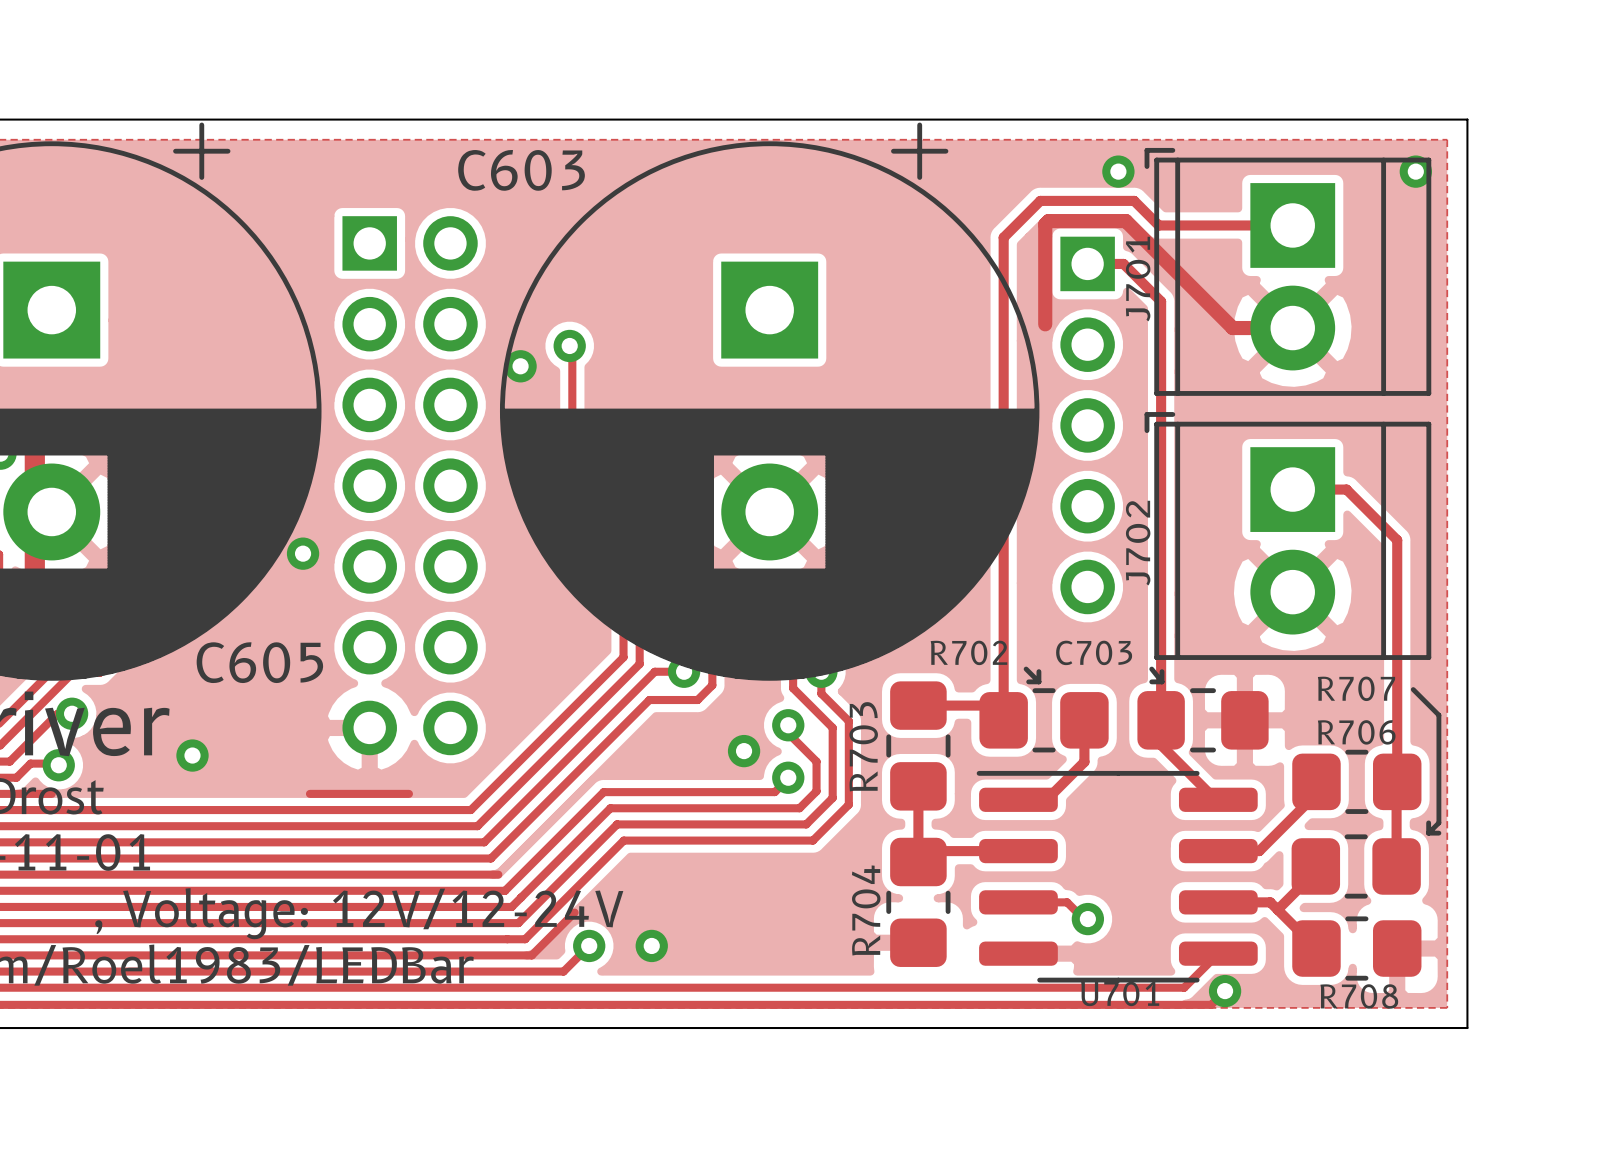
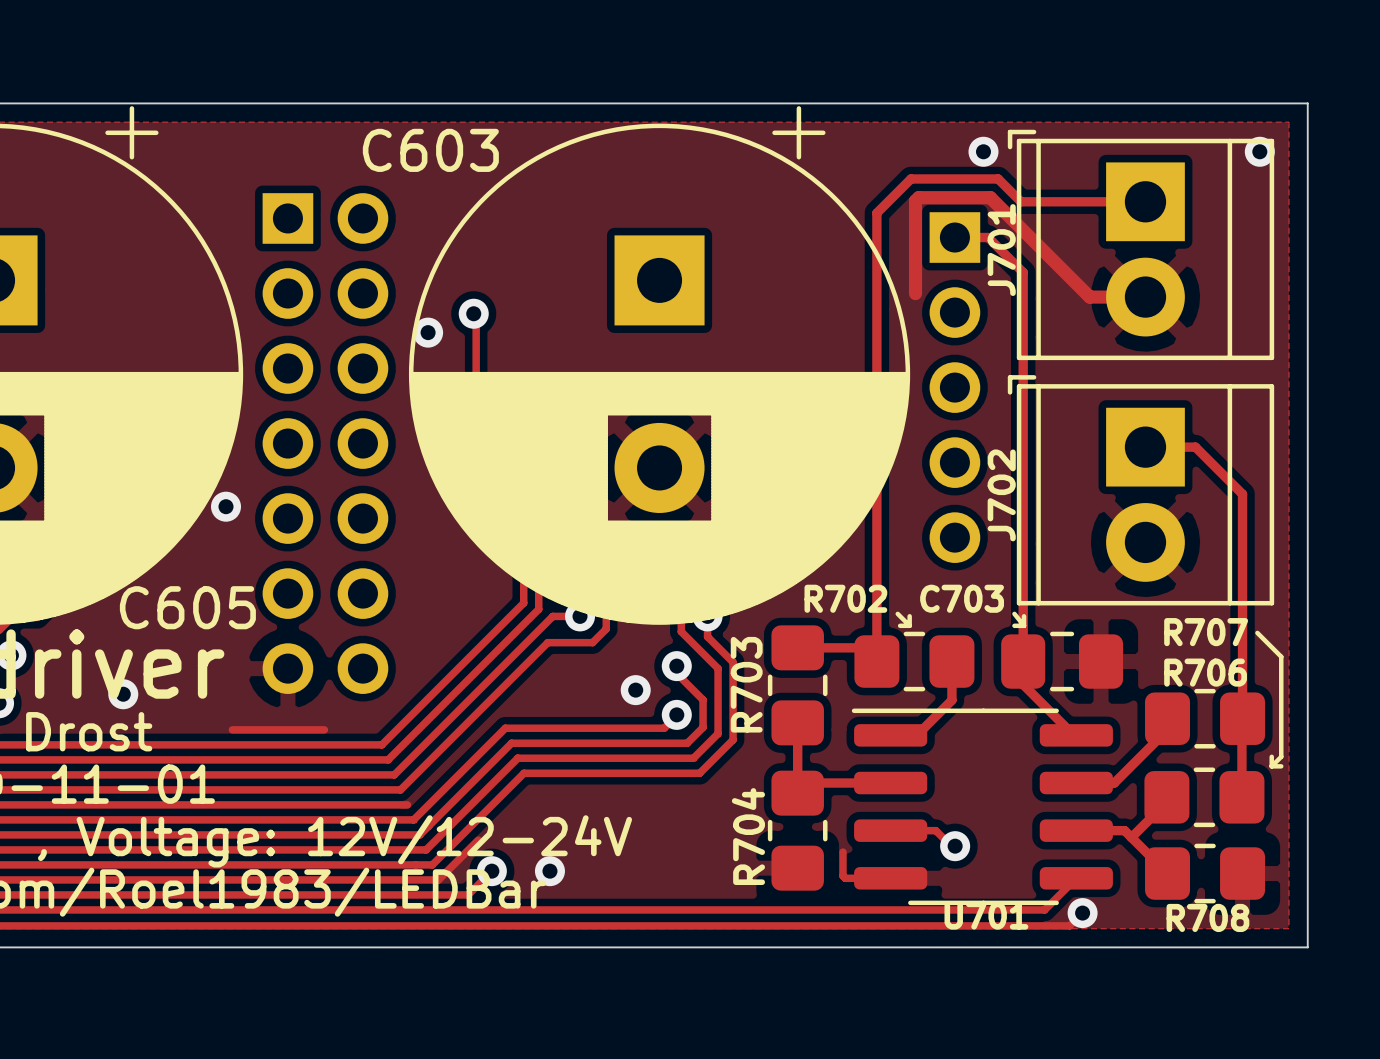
track: none -> (842, 852) (842, 875) (845, 878) (890, 878)

